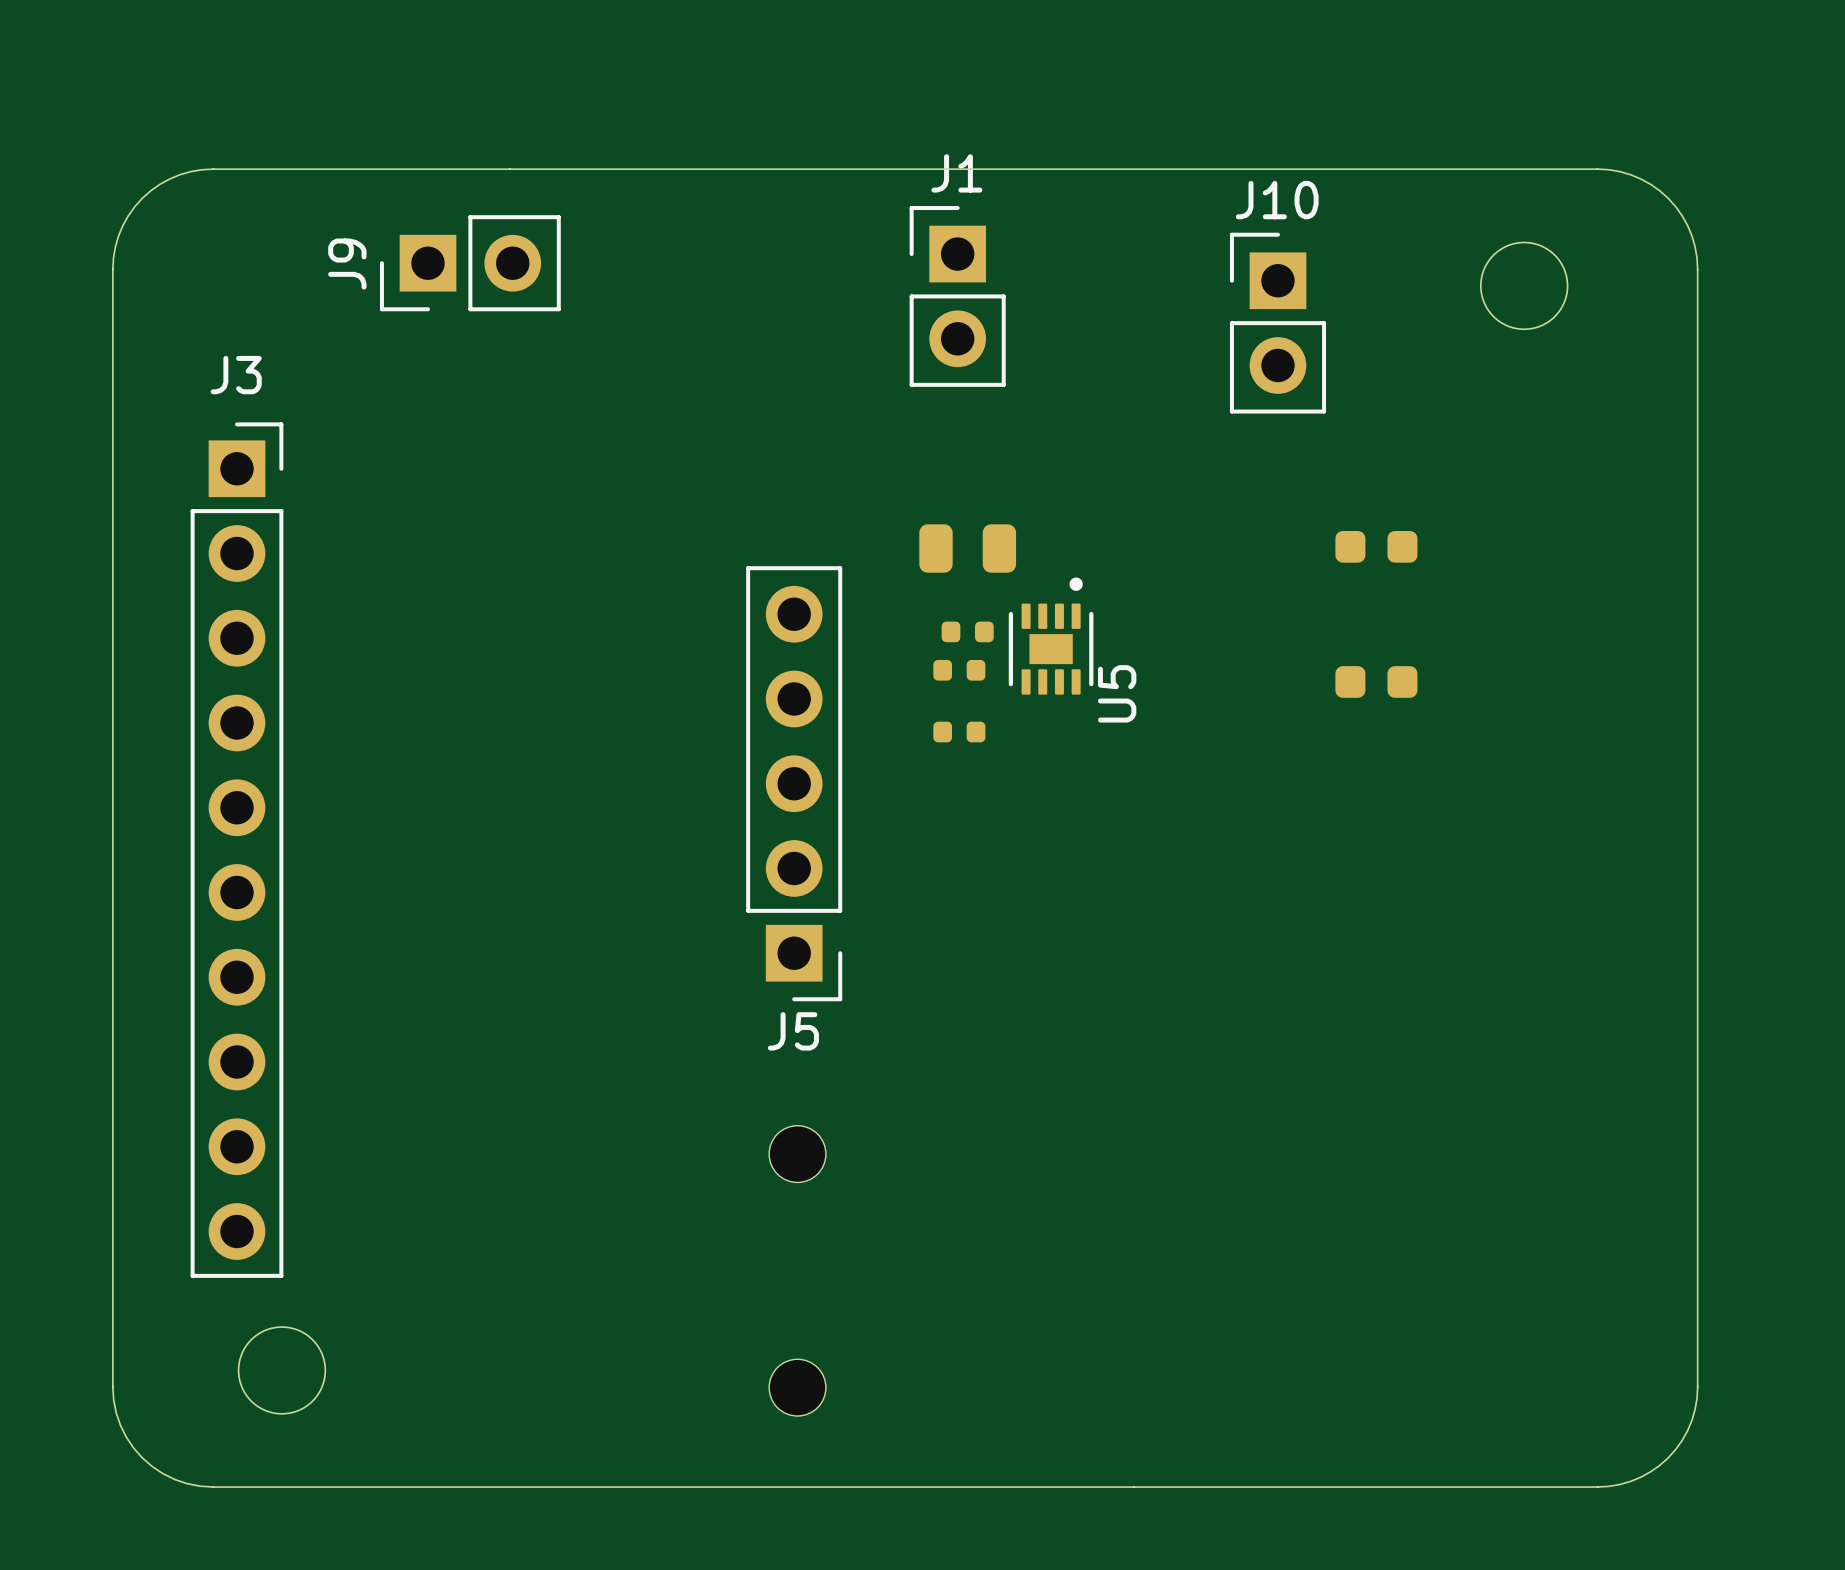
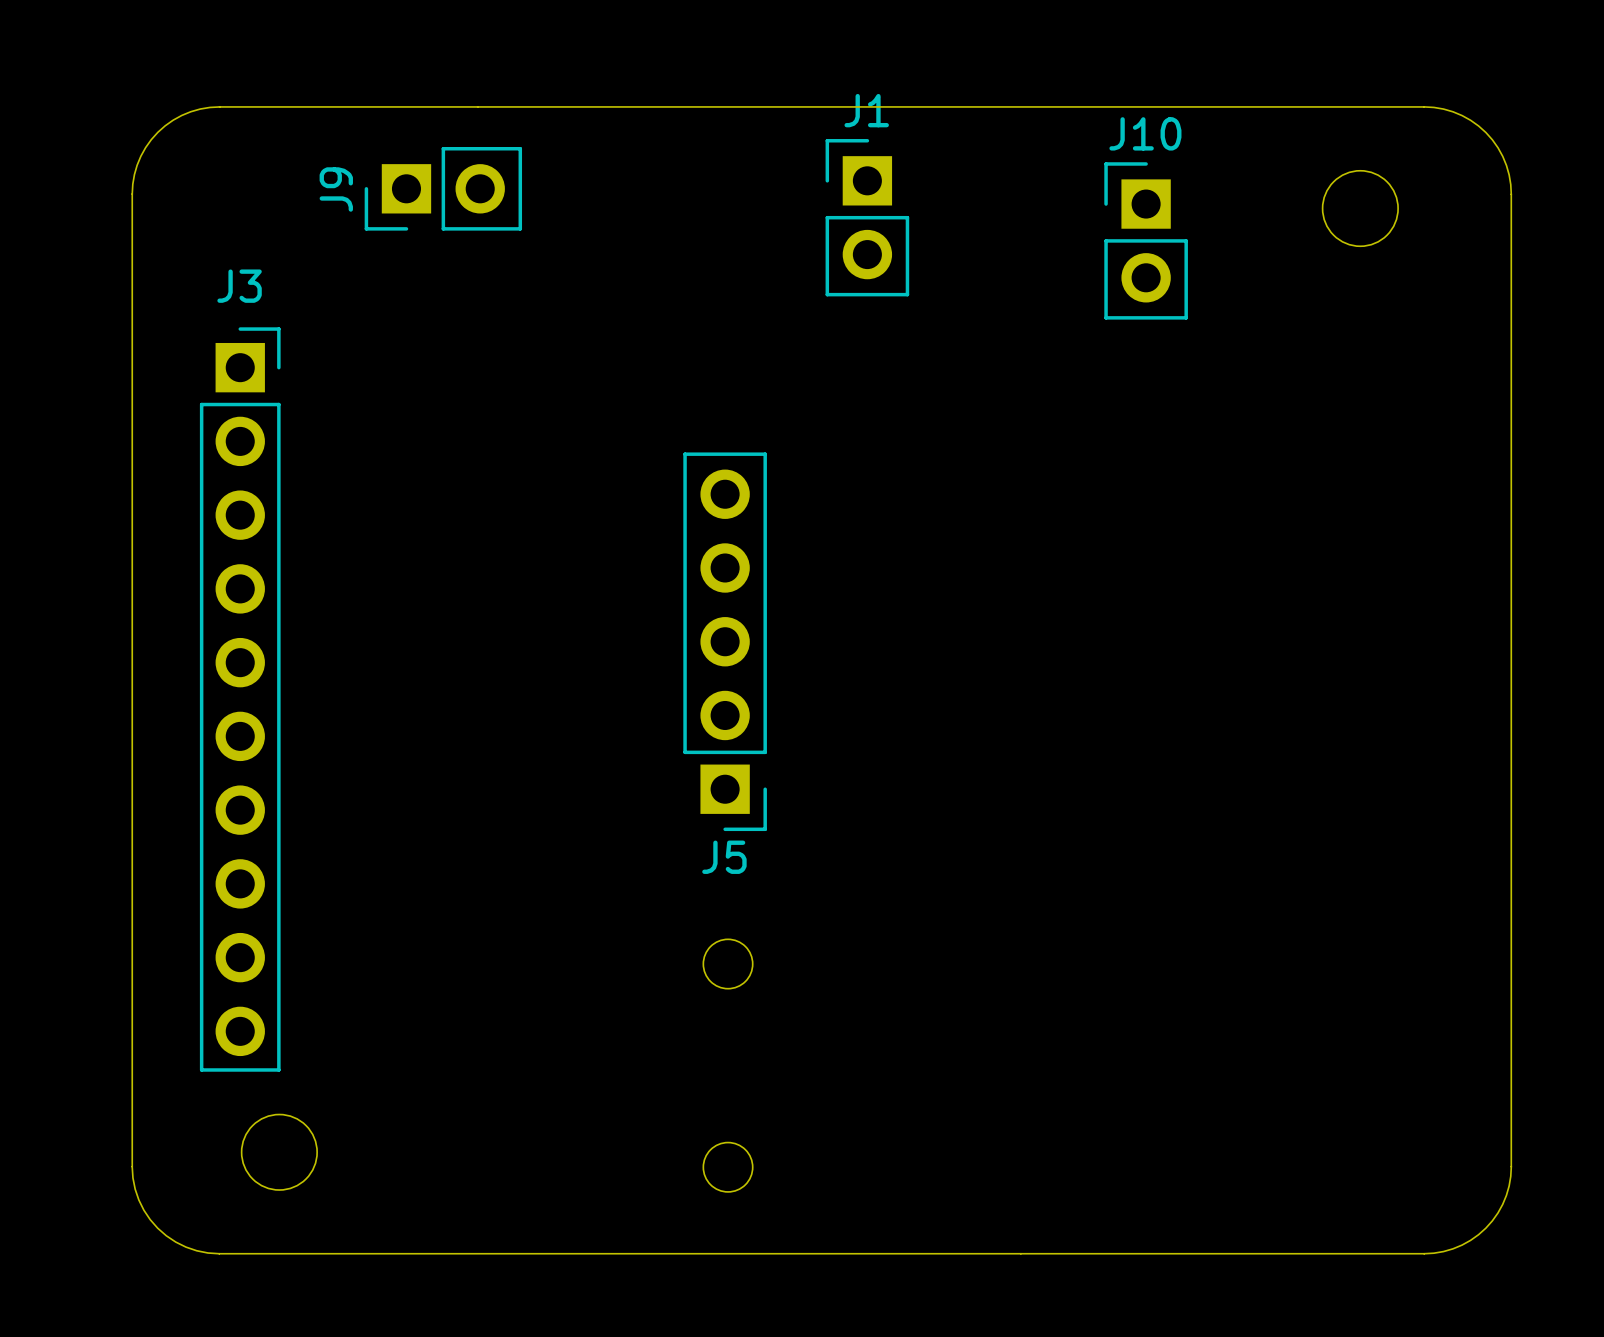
part: (1376, 546) -> none
part: (967, 548) -> none
part: (967, 631) -> none
U5: (1051, 636) -> none
part: (959, 670) -> none
part: (1376, 681) -> none
part: (959, 732) -> none

